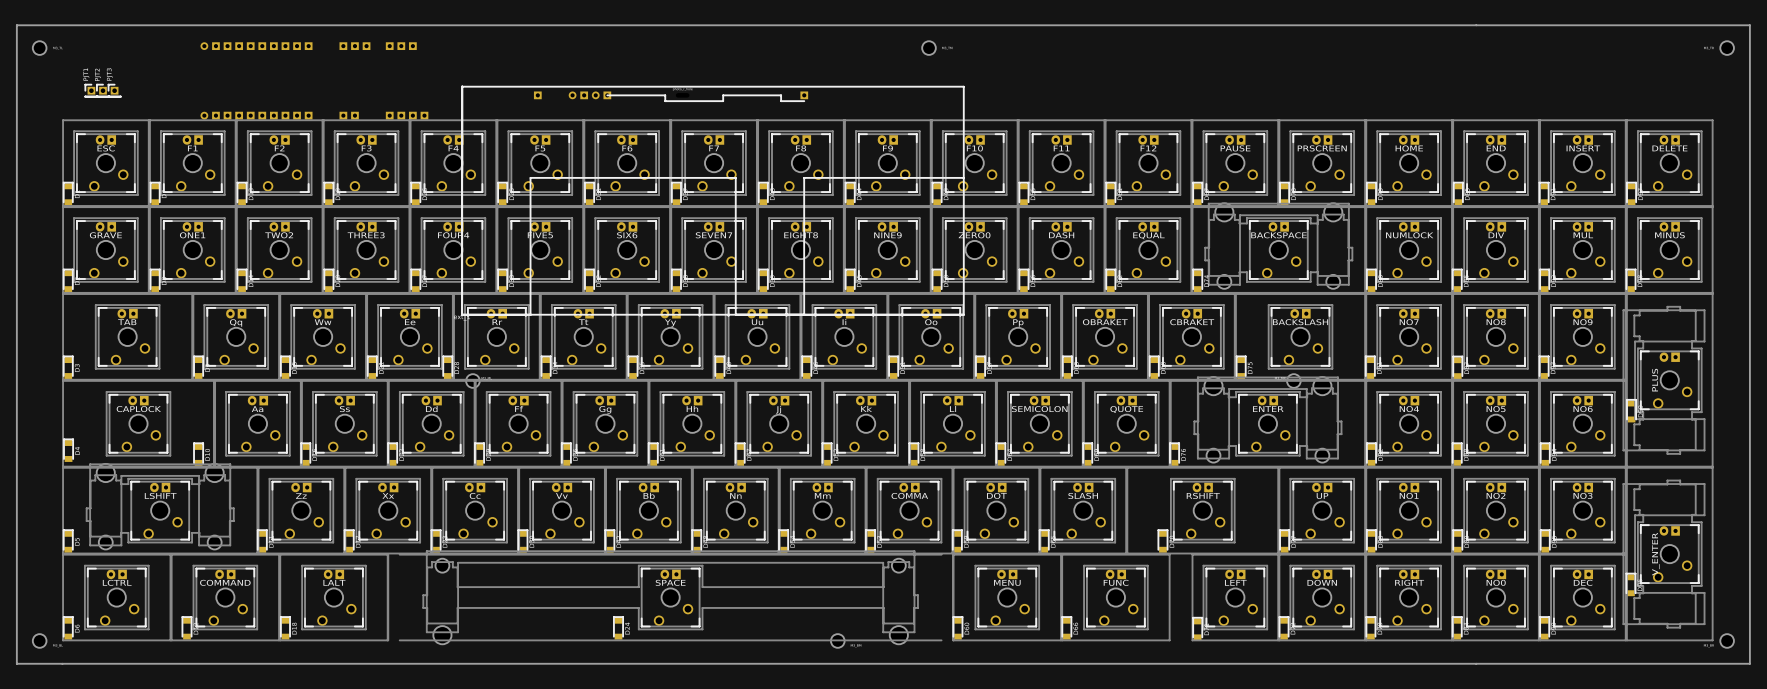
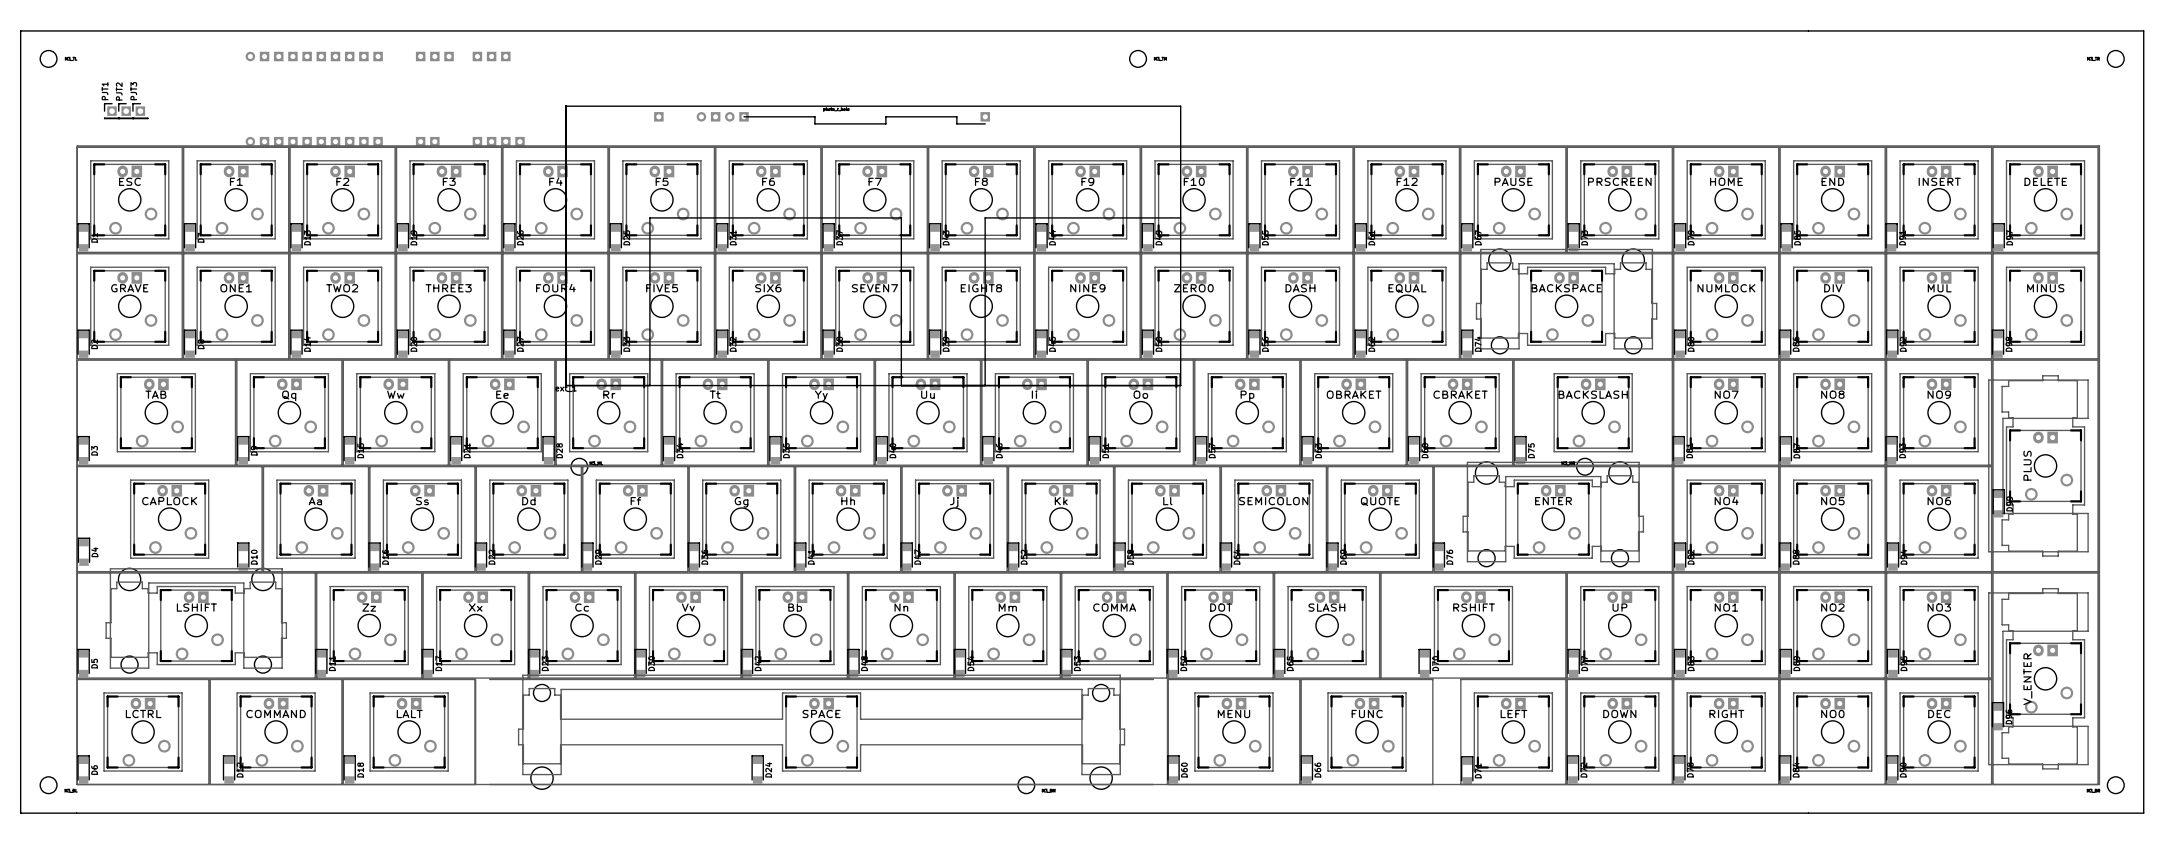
line: none -> (77, 145) (77, 784) (2099, 784) (2099, 145) (77, 145)

